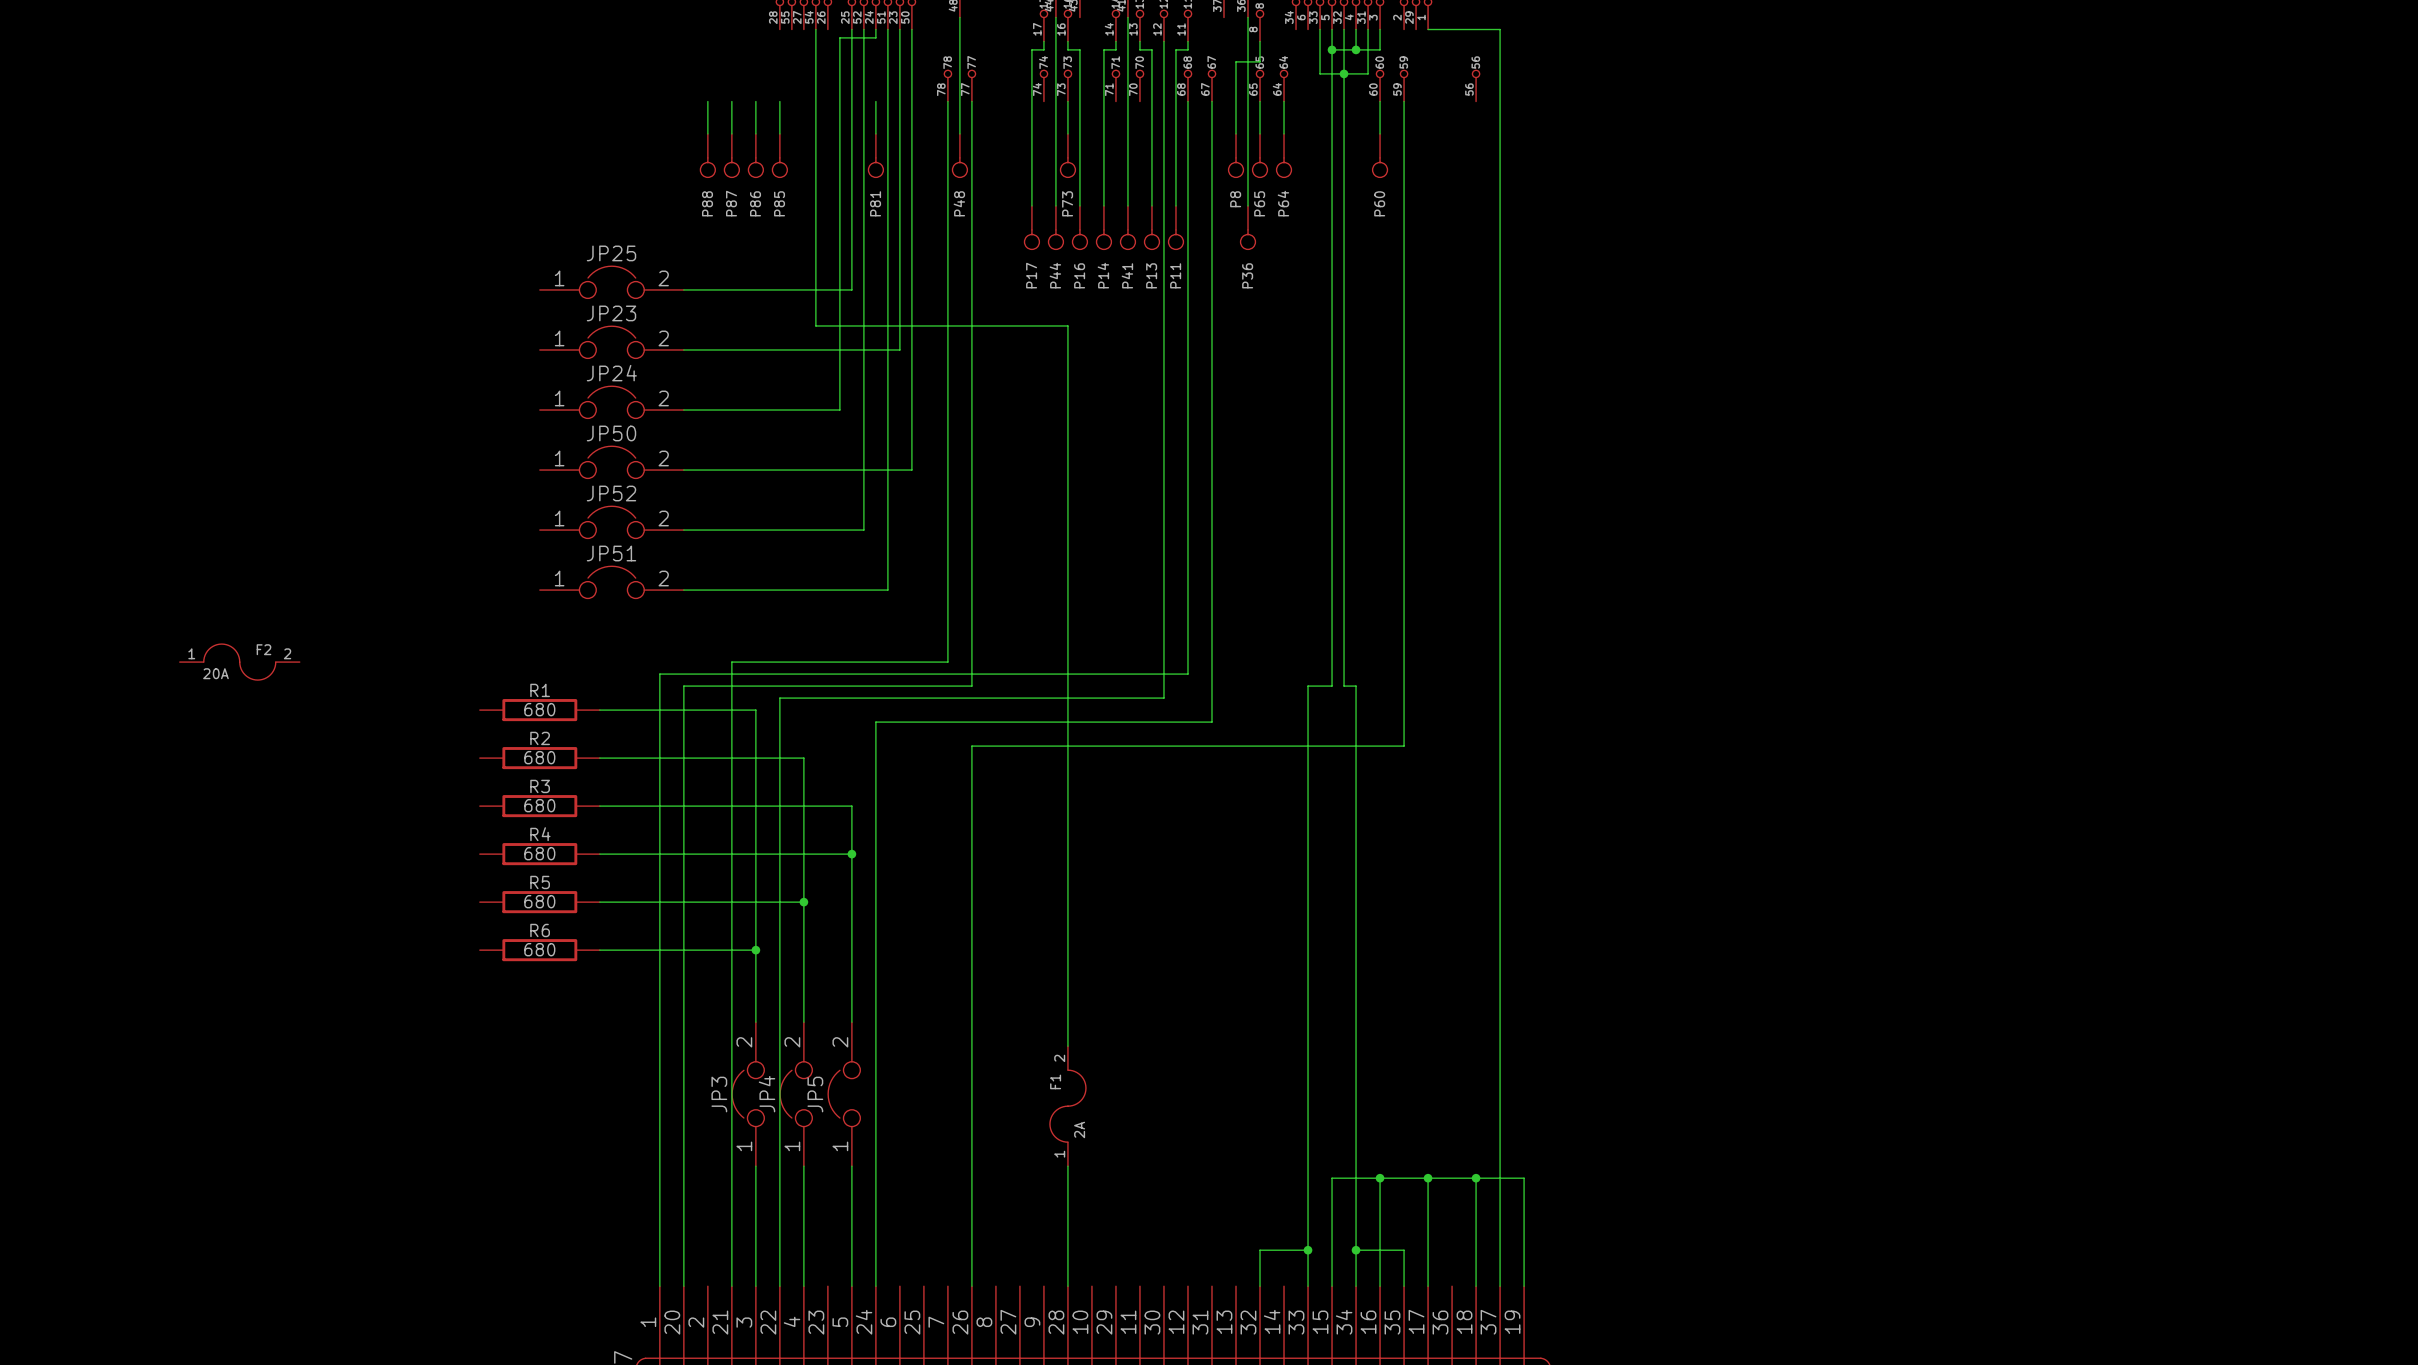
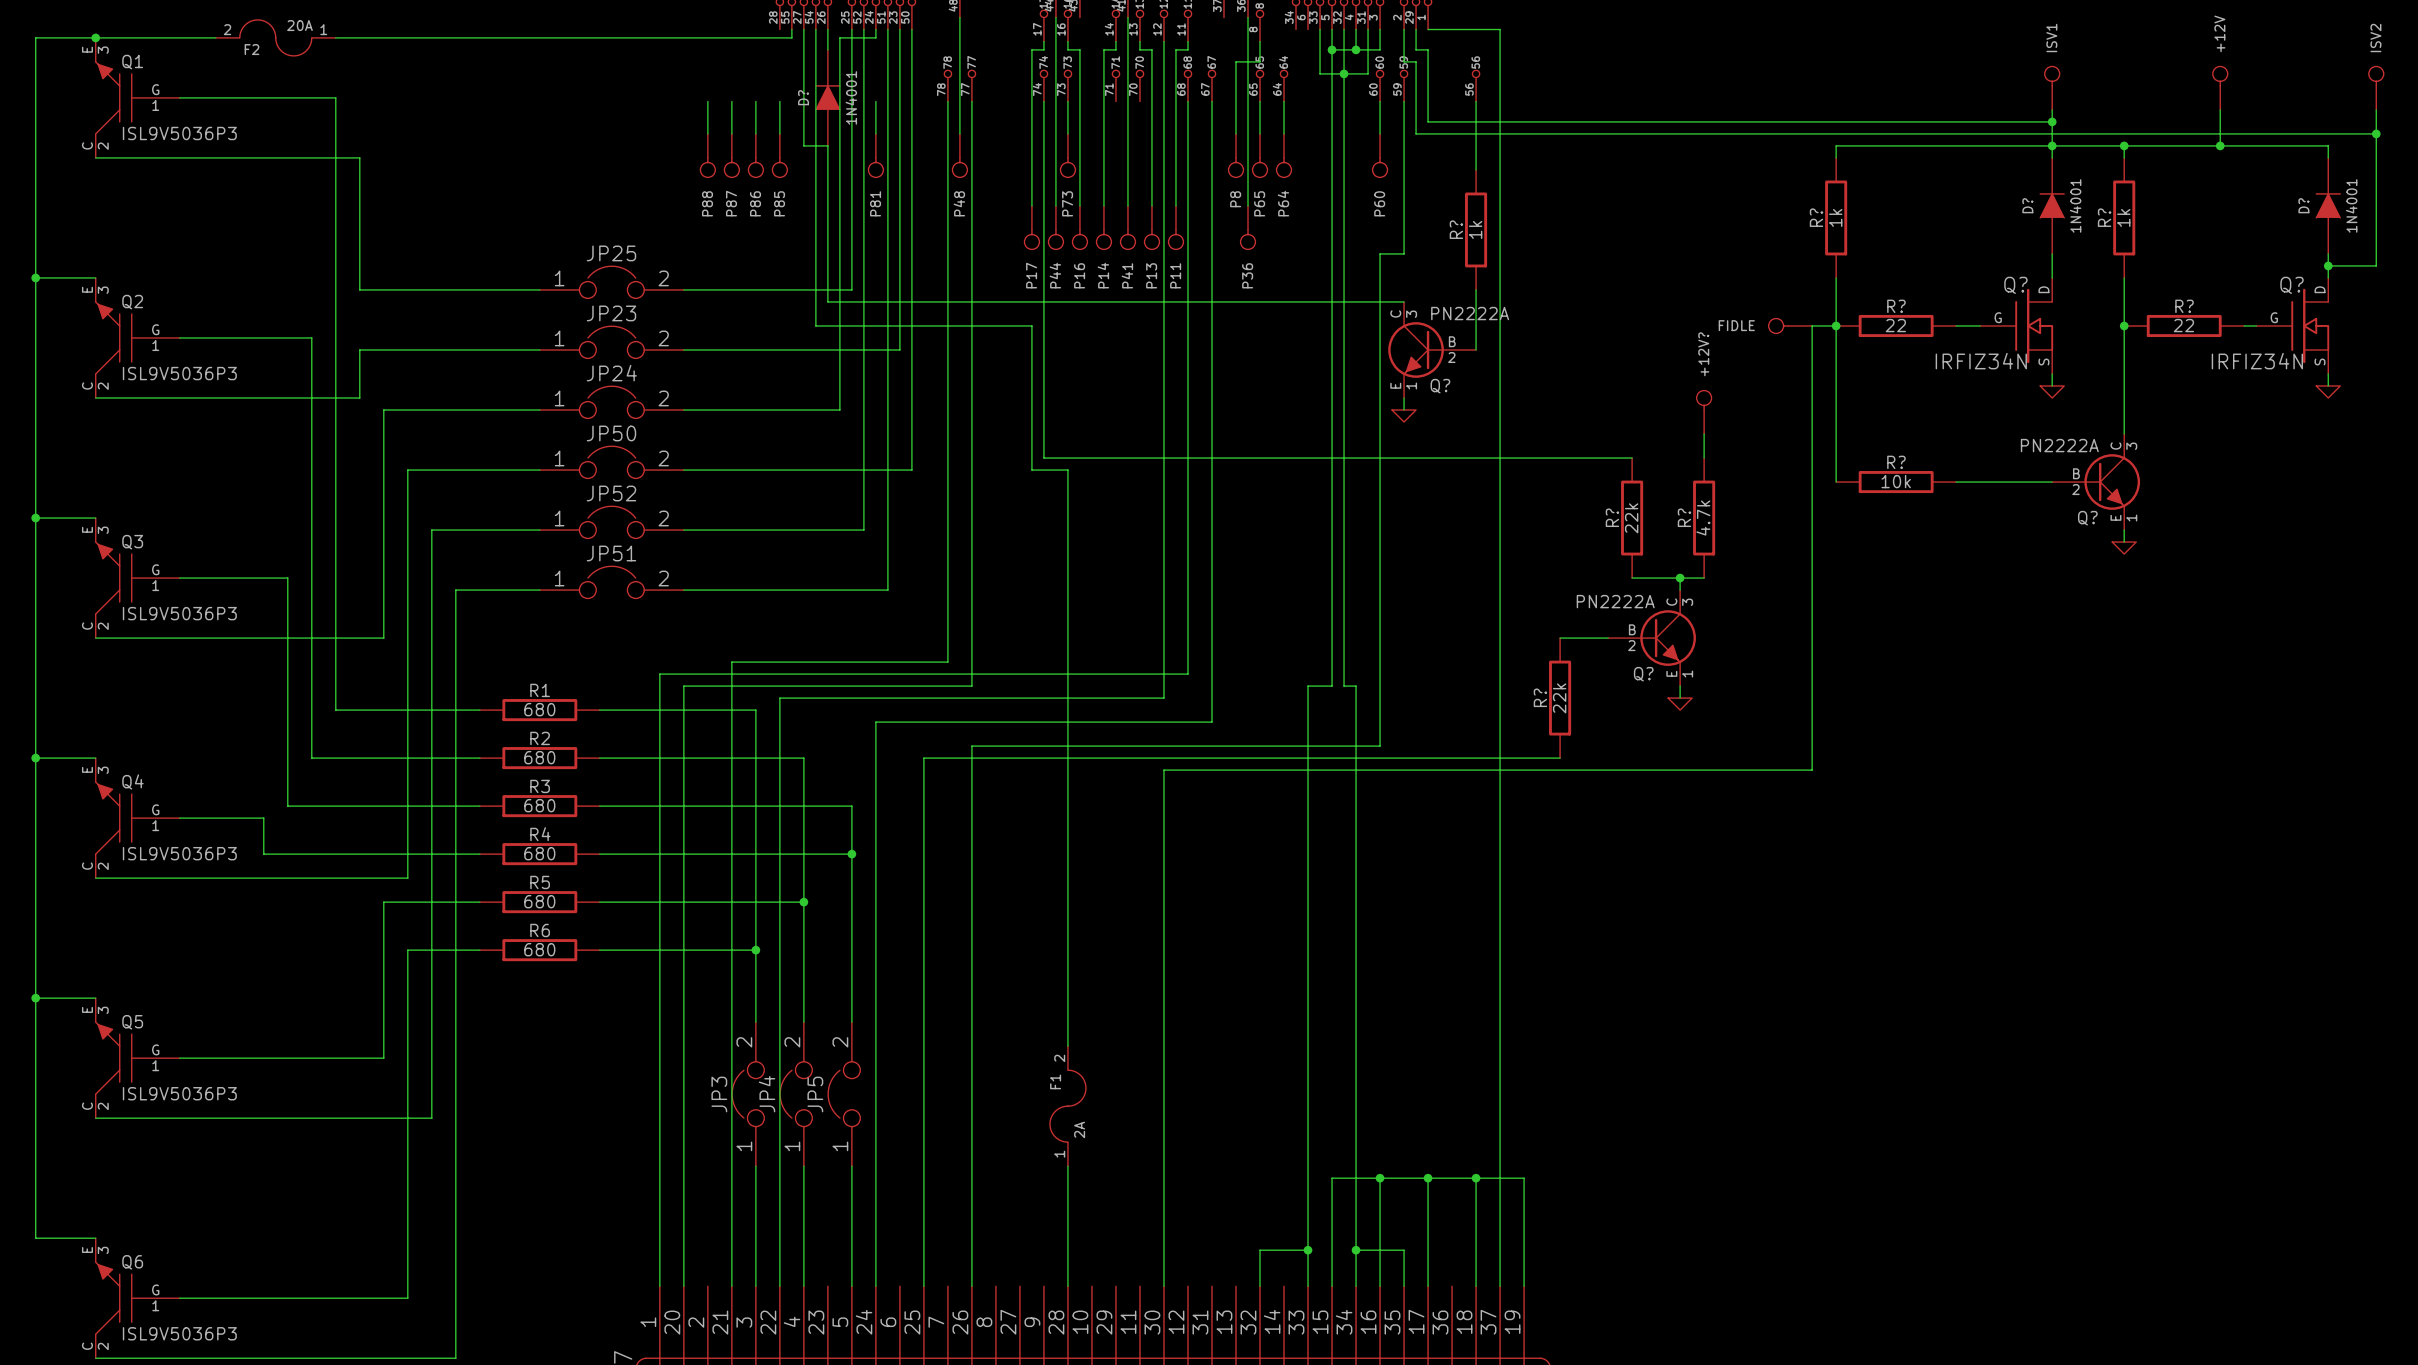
wire: none -> (791, 29) (791, 37) (335, 37)
wire: none -> (803, 29) (803, 145) (827, 145) (827, 301) (1404, 301)
wire: none -> (827, 29) (827, 49)
wire: none -> (1404, 29) (1404, 61) (1416, 61) (1416, 133) (2376, 133)
wire: none -> (1416, 29) (1416, 49) (1428, 49) (1428, 121) (2052, 121)
junction: none -> (95, 37)
wire: none -> (215, 37) (35, 37) (35, 1238) (95, 1238)
ISV1: none -> (2052, 88)
+12V: none -> (2220, 88)
ISV2: none -> (2376, 88)
Q1: none -> ISL9V5036P3 (137, 97)
wire: none -> (179, 97) (335, 97) (335, 710) (479, 710)
D?: none -> 1N4001 (827, 97)
wire: none -> (1043, 101) (1043, 458) (1632, 458)
wire: none -> (1476, 101) (1476, 169)
wire: none -> (2052, 109) (2052, 157)
wire: none -> (2220, 109) (2220, 145)
wire: none -> (2376, 109) (2376, 265) (2328, 265)
junction: none -> (2052, 121)
junction: none -> (2376, 133)
junction: none -> (2052, 145)
wire: none -> (2124, 145) (2124, 157)
junction: none -> (2124, 145)
junction: none -> (2220, 145)
wire: none -> (95, 157) (359, 157) (359, 289) (539, 289)
wire: none -> (1836, 157) (1836, 145) (2328, 145) (2328, 157)
D?: none -> 1N4001 (2052, 205)
D?: none -> 1N4001 (2328, 205)
R?: none -> 1k (1836, 217)
R?: none -> 1k (2124, 217)
R?: none -> 1k (1476, 229)
wire: (1404, 253) (1404, 398) -> none
wire: none -> (2052, 253) (2052, 277)
wire: none -> (2328, 253) (2328, 277)
junction: none -> (2328, 265)
wire: none -> (35, 277) (95, 277)
junction: none -> (35, 277)
wire: none -> (1836, 277) (1836, 482)
wire: none -> (2124, 277) (2124, 434)
wire: none -> (1476, 289) (1476, 349)
wire: (1031, 325) (1067, 325) (1067, 470) -> (1031, 325) (1031, 470) (1067, 470)
FIDLE: none -> (1790, 325)
wire: none -> (1836, 325) (1812, 325) (1812, 770) (1163, 770) (1163, 1286)
junction: none -> (1836, 325)
R?: none -> 22 (1896, 325)
wire: none -> (1956, 325) (1980, 325)
Q?: none -> IRFIZ34N (2016, 325)
junction: none -> (2124, 325)
R?: none -> 22 (2184, 325)
wire: none -> (2244, 325) (2256, 325)
Q?: none -> IRFIZ34N (2292, 325)
Q2: none -> ISL9V5036P3 (137, 337)
wire: none -> (179, 337) (311, 337) (311, 758) (479, 758)
wire: none -> (539, 349) (359, 349) (359, 398) (95, 398)
Q?: none -> PN2222A (1432, 349)
wire: none -> (2052, 374) (2052, 386)
wire: none -> (2328, 374) (2328, 386)
power symbol: none -> (2052, 392)
power symbol: none -> (2328, 392)
wire: none -> (539, 410) (383, 410) (383, 638) (95, 638)
wire: (1404, 410) (1404, 746) (1380, 746) -> (1404, 253) (1380, 253) (1380, 746)
+12V?: none -> (1704, 412)
power symbol: none -> (1404, 416)
wire: none -> (1704, 434) (1704, 458)
wire: none -> (539, 470) (407, 470) (407, 878) (95, 878)
R?: none -> 10k (1896, 482)
wire: none -> (1956, 482) (2052, 482)
Q?: none -> PN2222A (2096, 482)
wire: none -> (35, 518) (95, 518)
junction: none -> (35, 518)
R?: none -> 22k (1632, 518)
R?: none -> 4.7k (1704, 518)
wire: none -> (539, 530) (431, 530) (431, 1118) (95, 1118)
wire: none -> (2124, 530) (2124, 542)
power symbol: none -> (2124, 548)
Q3: none -> ISL9V5036P3 (137, 578)
wire: none -> (179, 578) (287, 578) (287, 806) (479, 806)
wire: none -> (1632, 578) (1704, 578)
wire: none -> (1680, 578) (1680, 590)
junction: none -> (1680, 578)
wire: none -> (539, 590) (455, 590) (455, 1358) (95, 1358)
wire: none -> (1560, 638) (1608, 638)
Q?: none -> PN2222A (1652, 638)
F2 rotation: 0° (239, 662) -> 180° (275, 37)
F2 position: (239, 662) -> (275, 37)
wire: none -> (1680, 686) (1680, 698)
R?: none -> 22k (1560, 698)
power symbol: none -> (1680, 704)
wire: none -> (35, 758) (95, 758)
junction: none -> (35, 758)
wire: none -> (1560, 758) (923, 758) (923, 1286)
Q4: none -> ISL9V5036P3 (137, 818)
wire: none -> (179, 818) (263, 818) (263, 854) (479, 854)
wire: none -> (479, 902) (383, 902) (383, 1058) (179, 1058)
wire: none -> (479, 950) (407, 950) (407, 1298) (179, 1298)
wire: none -> (35, 998) (95, 998)
junction: none -> (35, 998)
Q5: none -> ISL9V5036P3 (137, 1058)
Q6: none -> ISL9V5036P3 (137, 1298)

